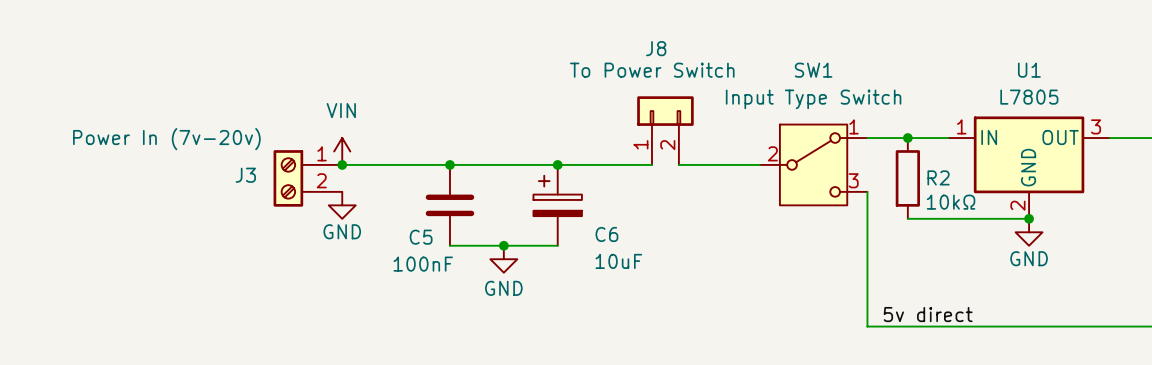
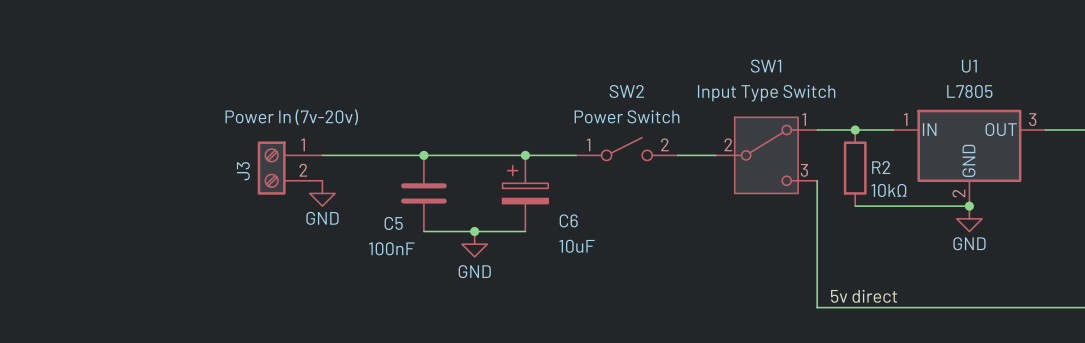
J8: To Power Switch (665, 130) -> none
J3 value position: Power In (7v-20v) (166, 139) -> Power In (7v-20v) (291, 117)
power symbol: VIN (342, 151) -> none
SW2: none -> Power Switch (626, 149)
junction: (342, 164) -> none
J3 name rotation: 0° (245, 175) -> 90° counterclockwise (243, 171)

